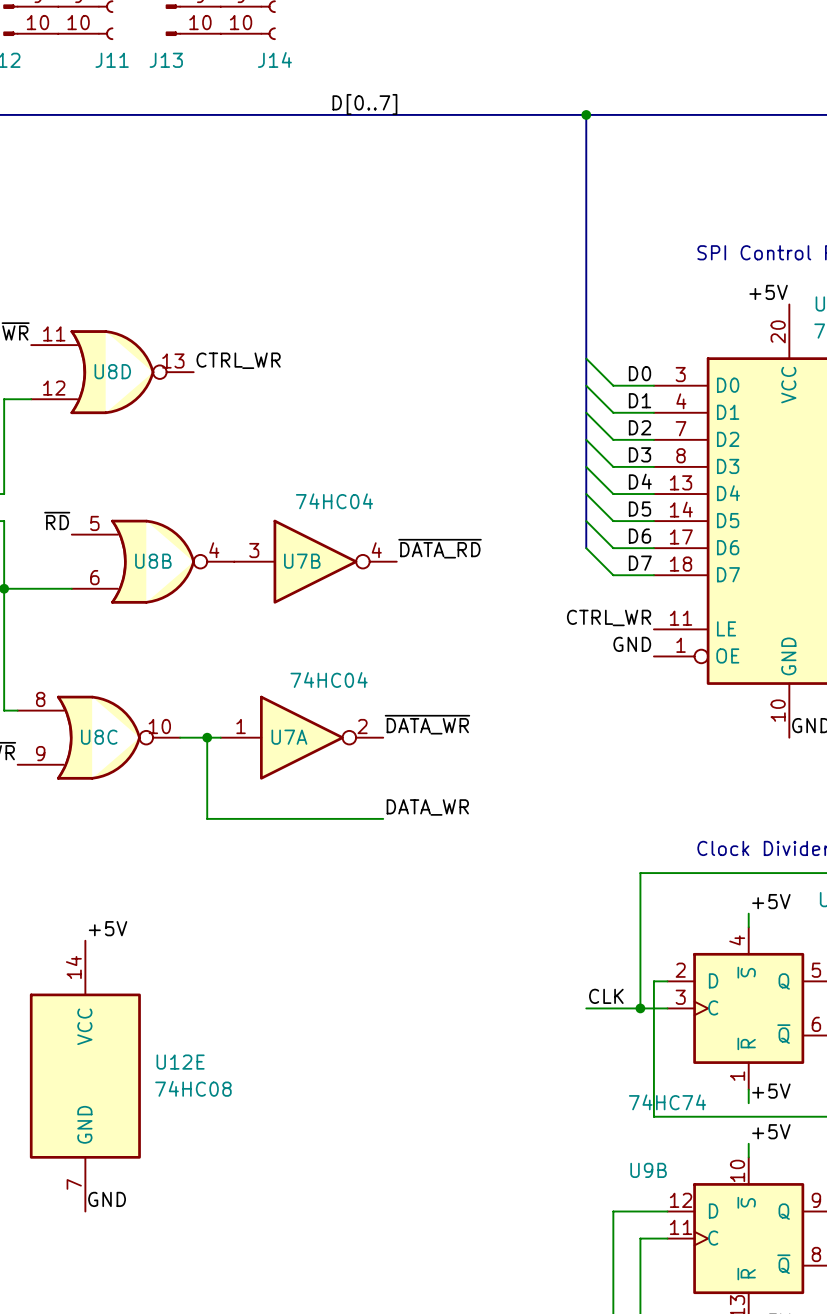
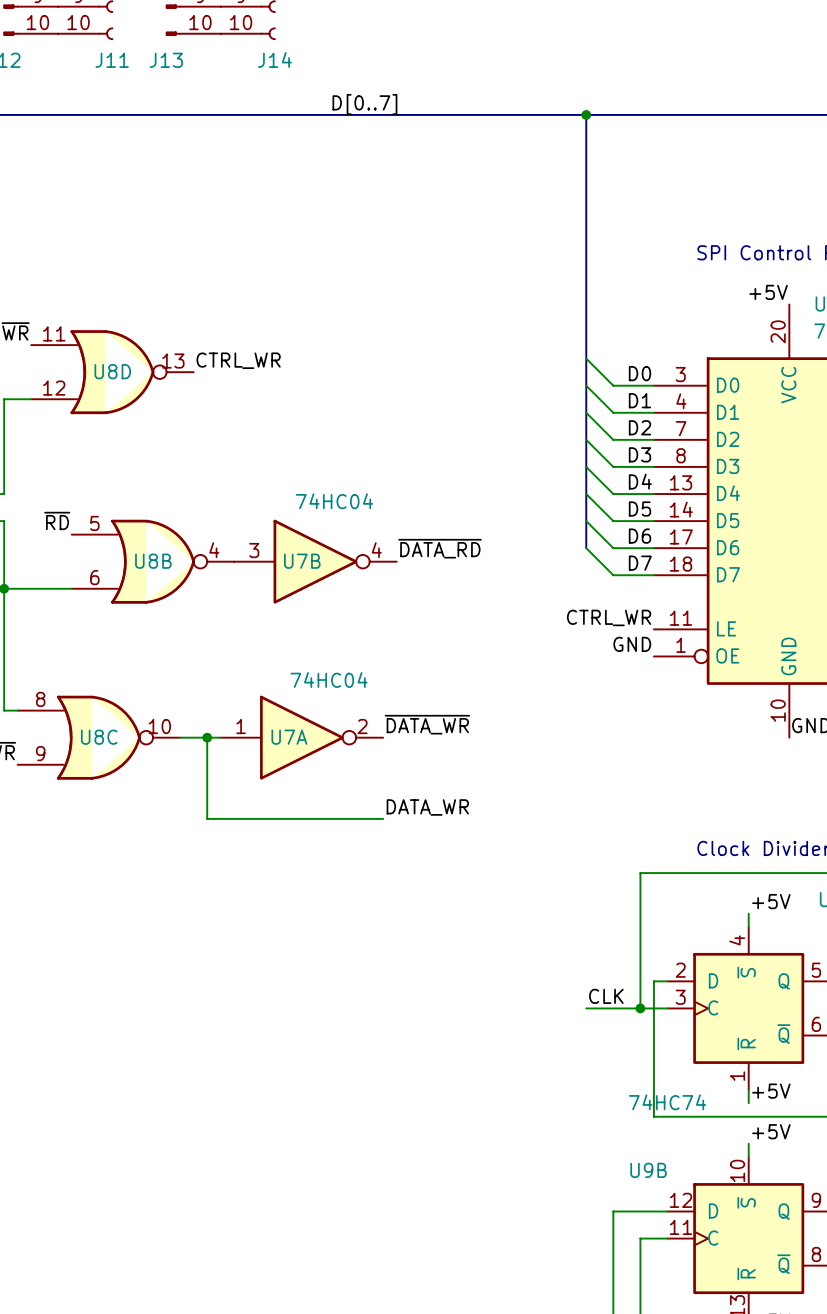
label: +5V (108, 928) -> none
U12E: 74HC08 (85, 1076) -> none
label: GND (107, 1199) -> none

